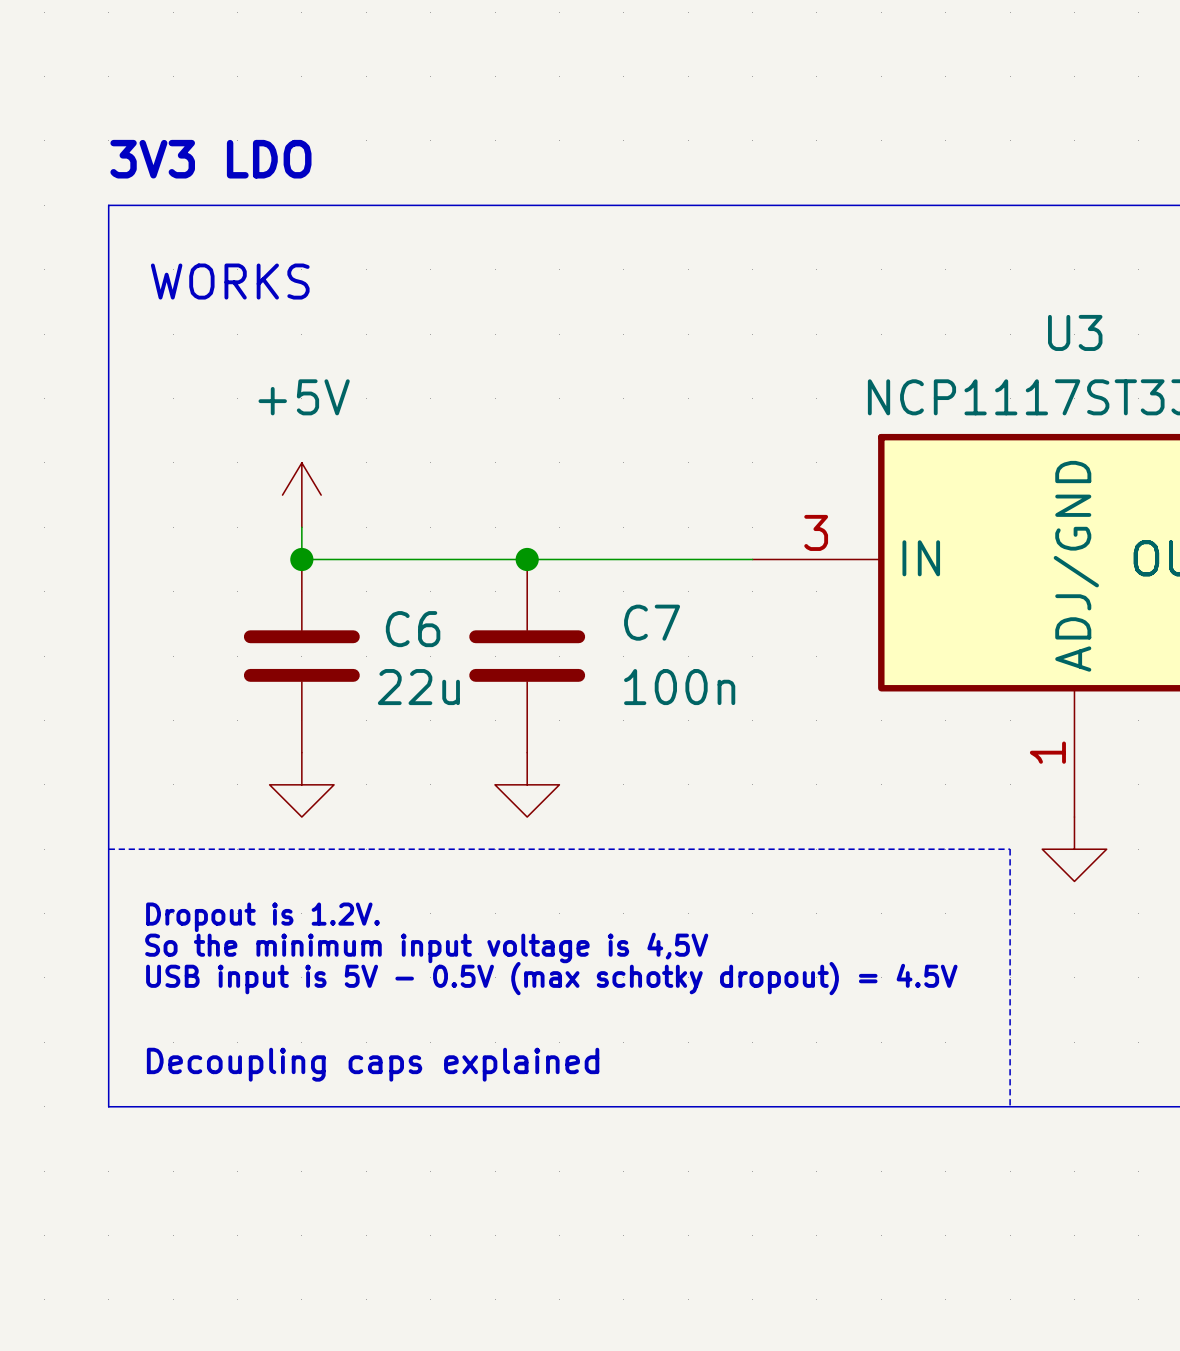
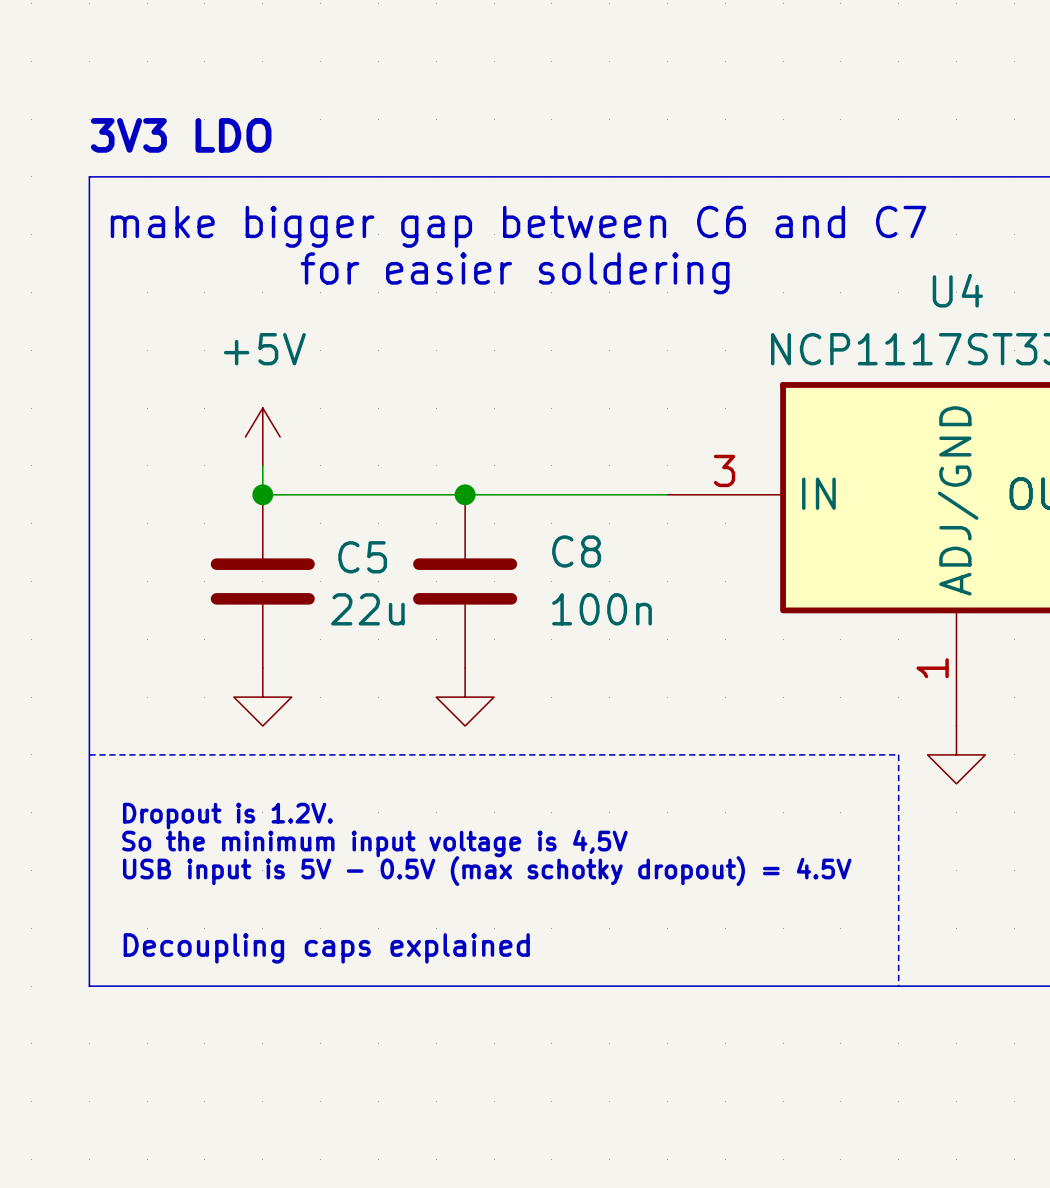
text: none -> make bigger gap between C6 and C7 (518, 226)
text: WORKS (230, 281) -> none
text: none -> for easier soldering (515, 273)
U3 name: U3 (1075, 332) -> U4 (957, 290)
C7 name: C7 (652, 622) -> C8 (576, 551)
C6 name: C6 (413, 629) -> C5 (362, 557)

